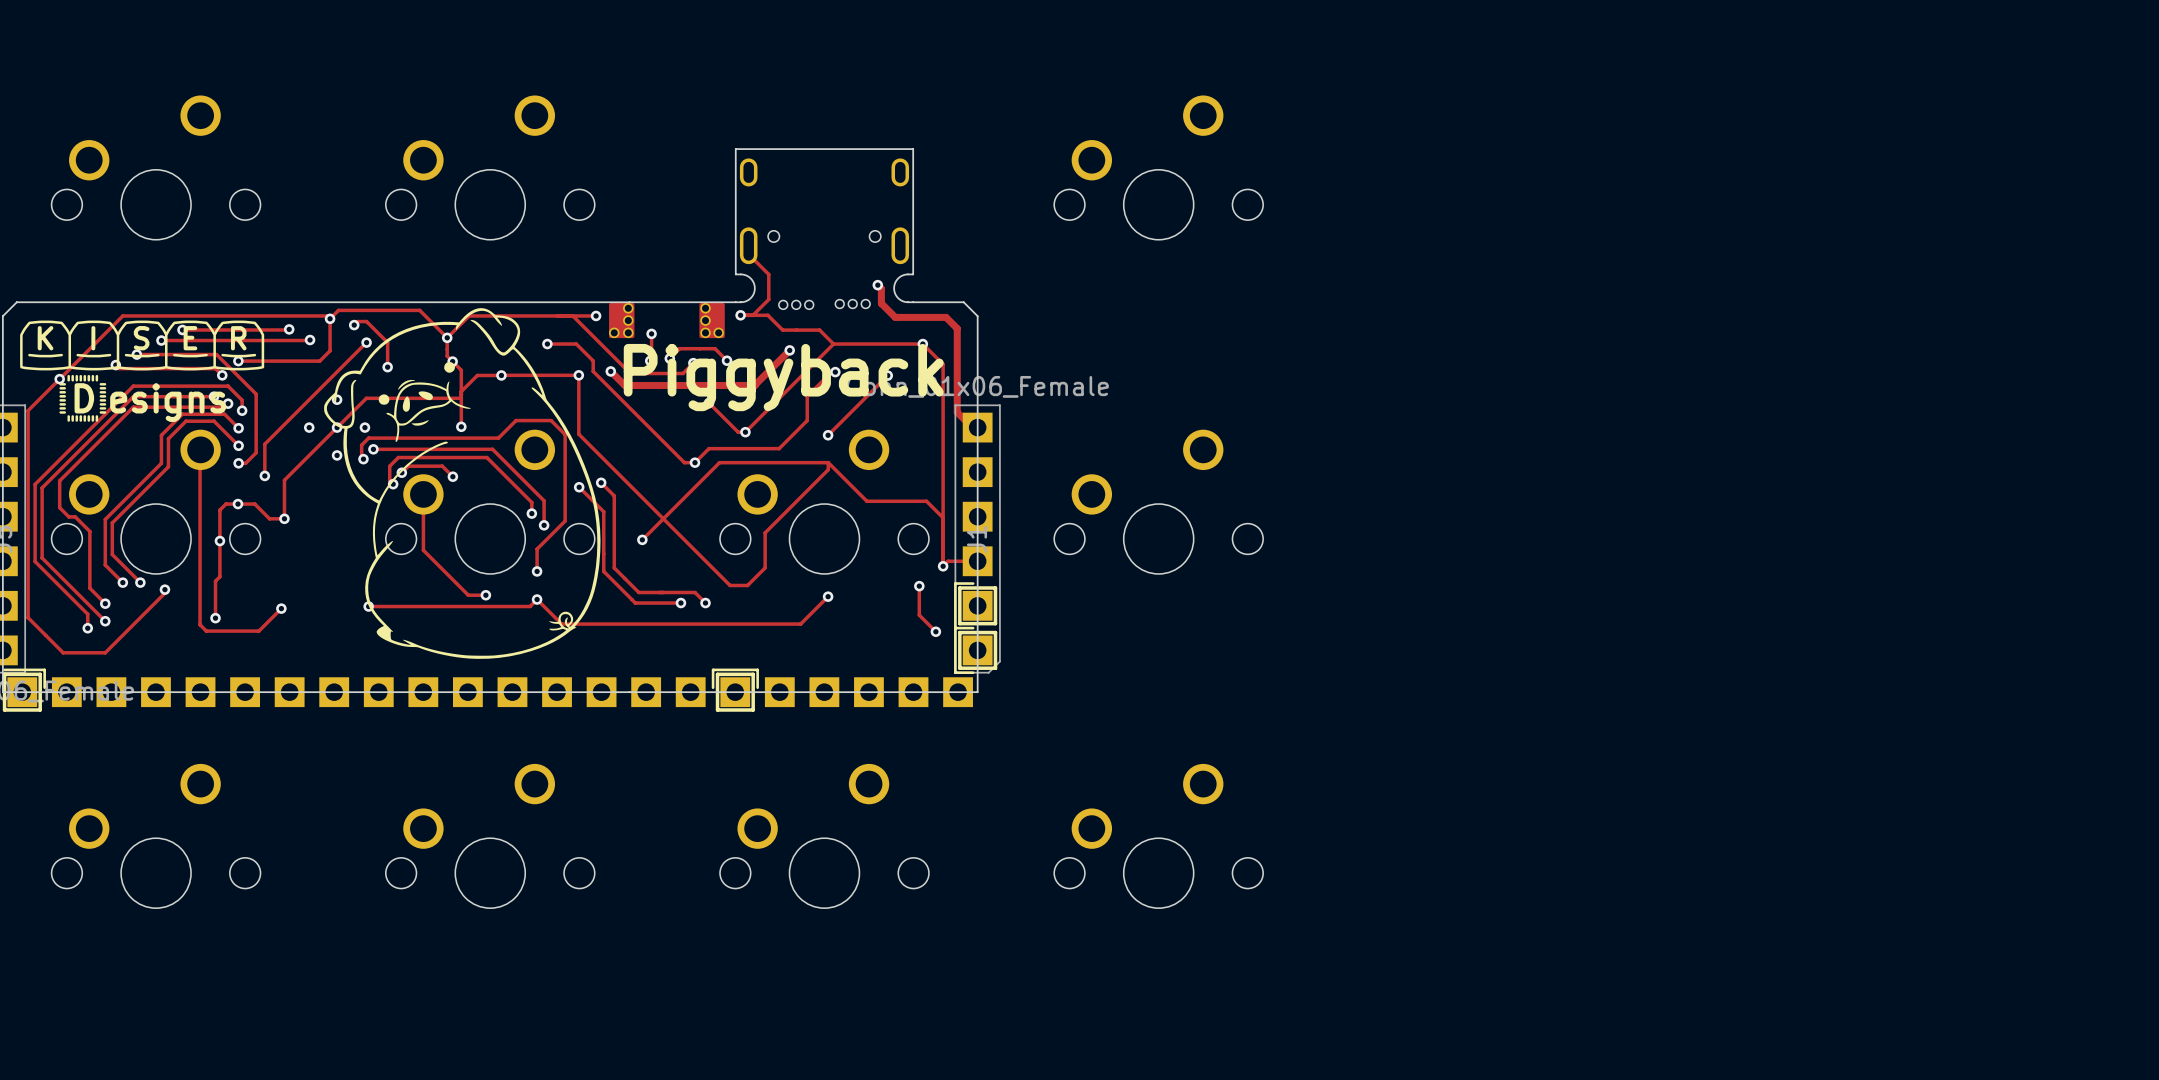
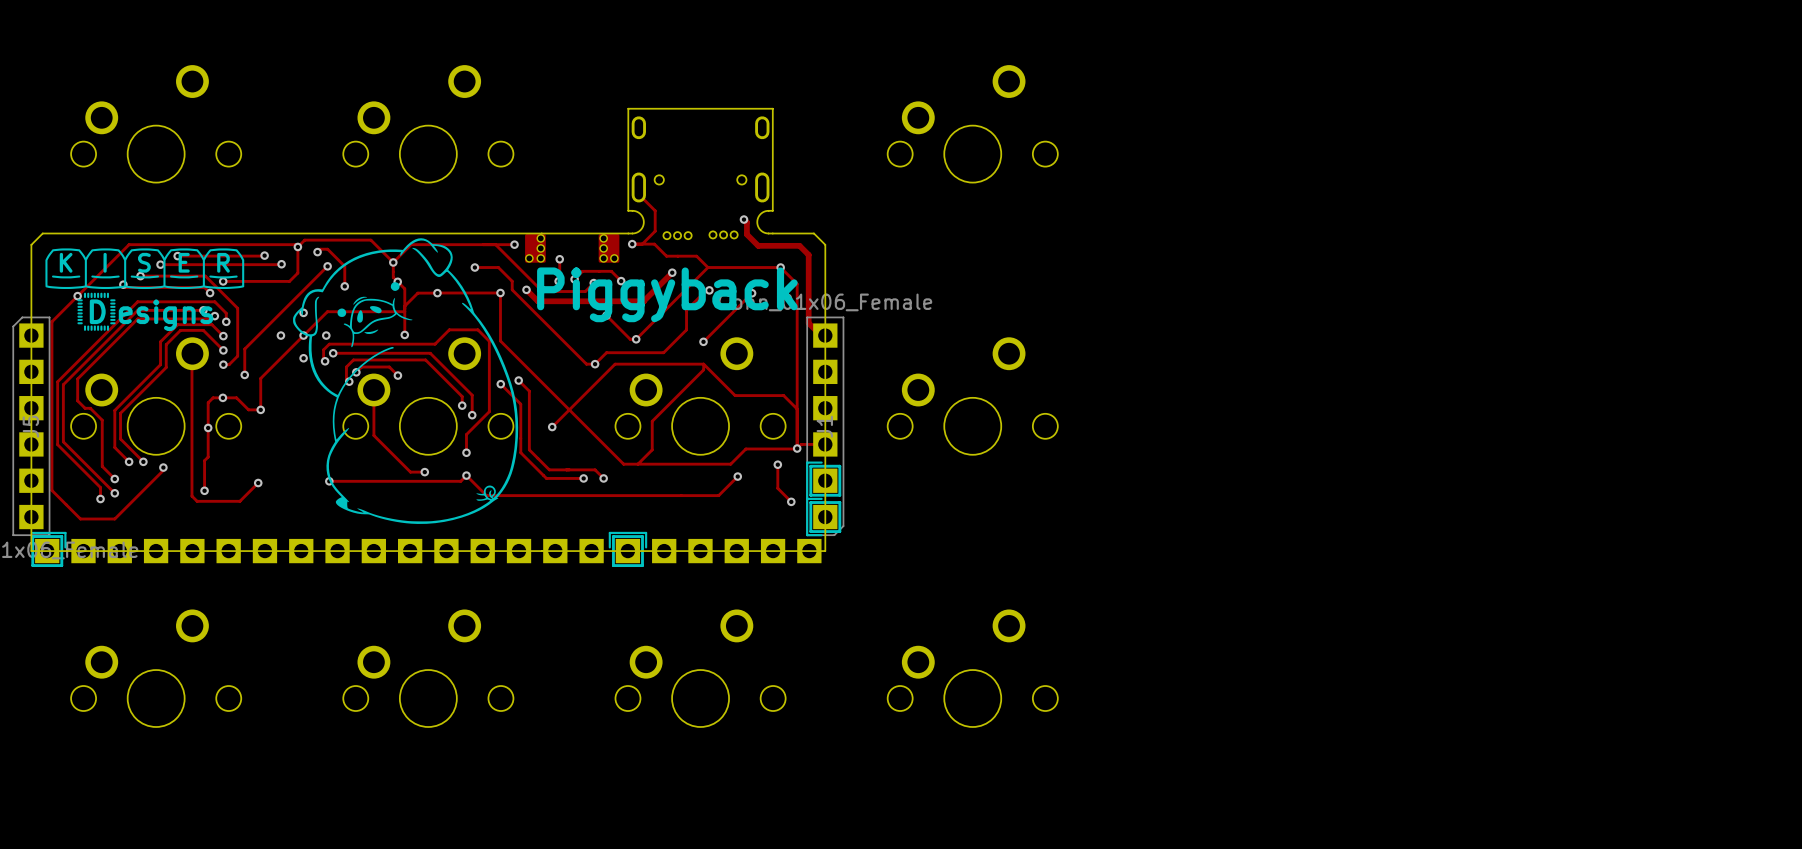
track: none -> (797, 448) (745, 448) (730, 464) (637, 464)
track: (828, 596) (800, 624) -> (737, 476) (718, 495) (681, 495)
via position: (828, 596) -> (737, 476)

